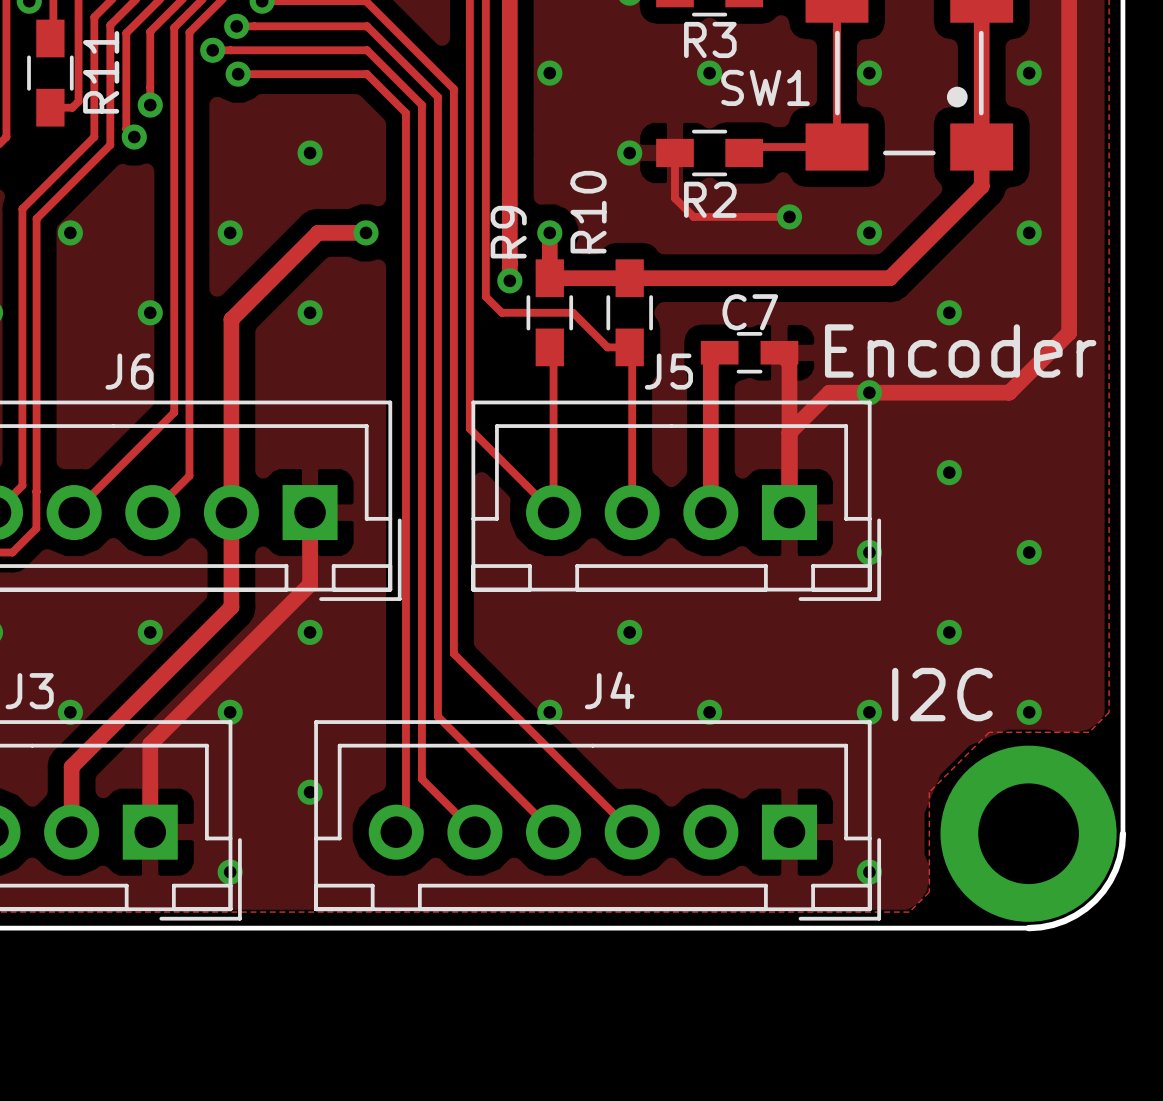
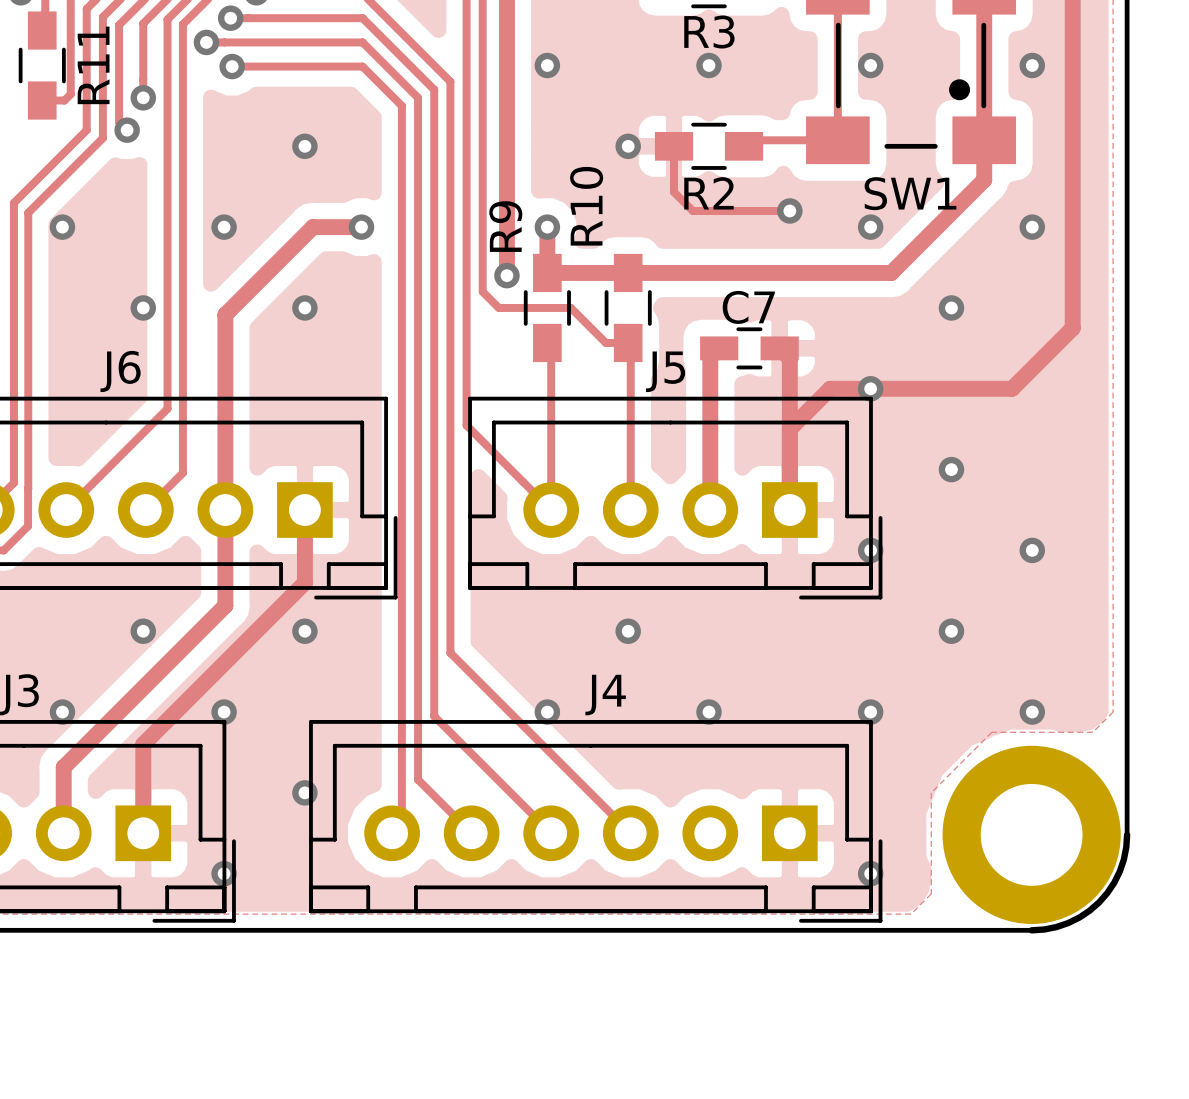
SW1 name position: SW1 (765, 87) -> SW1 (910, 193)
text: Encoder (960, 350) -> none
text: I2C (942, 694) -> none

